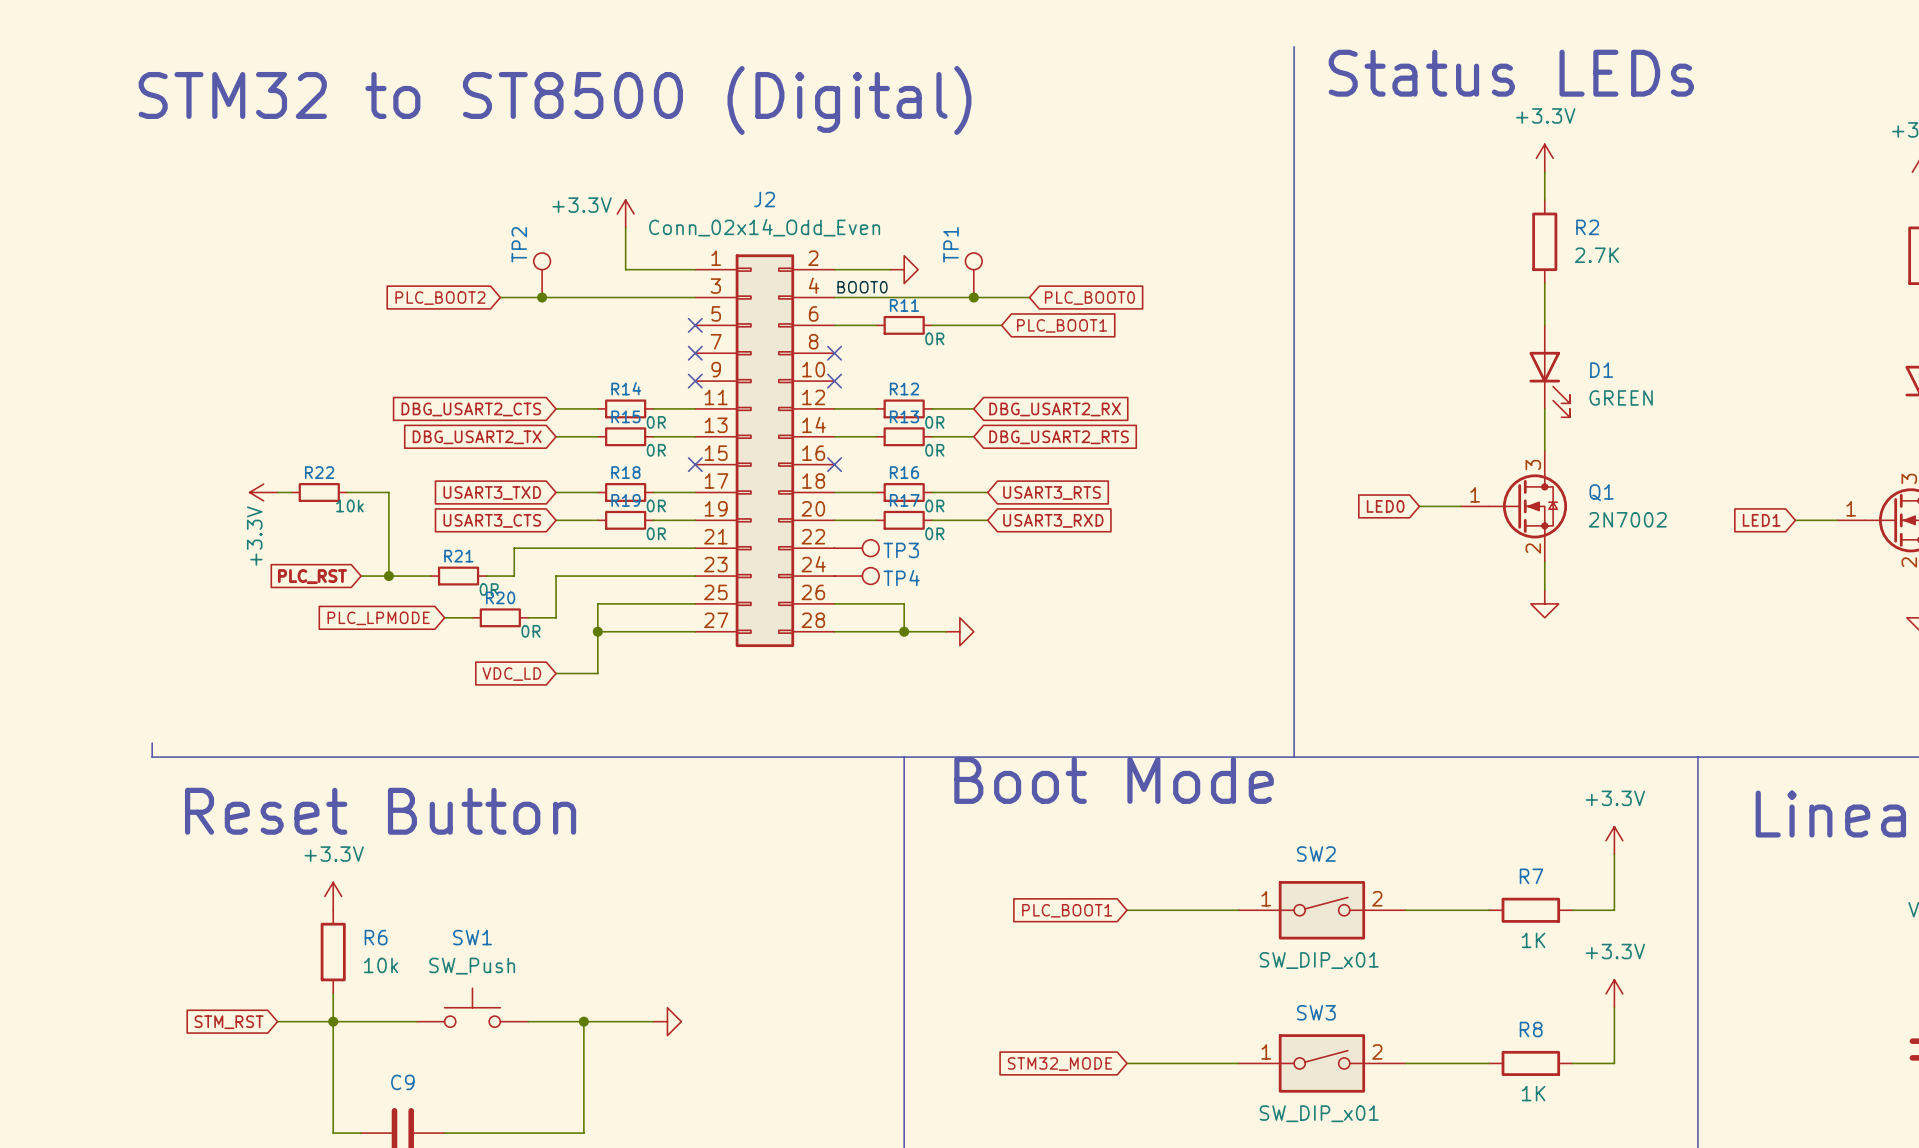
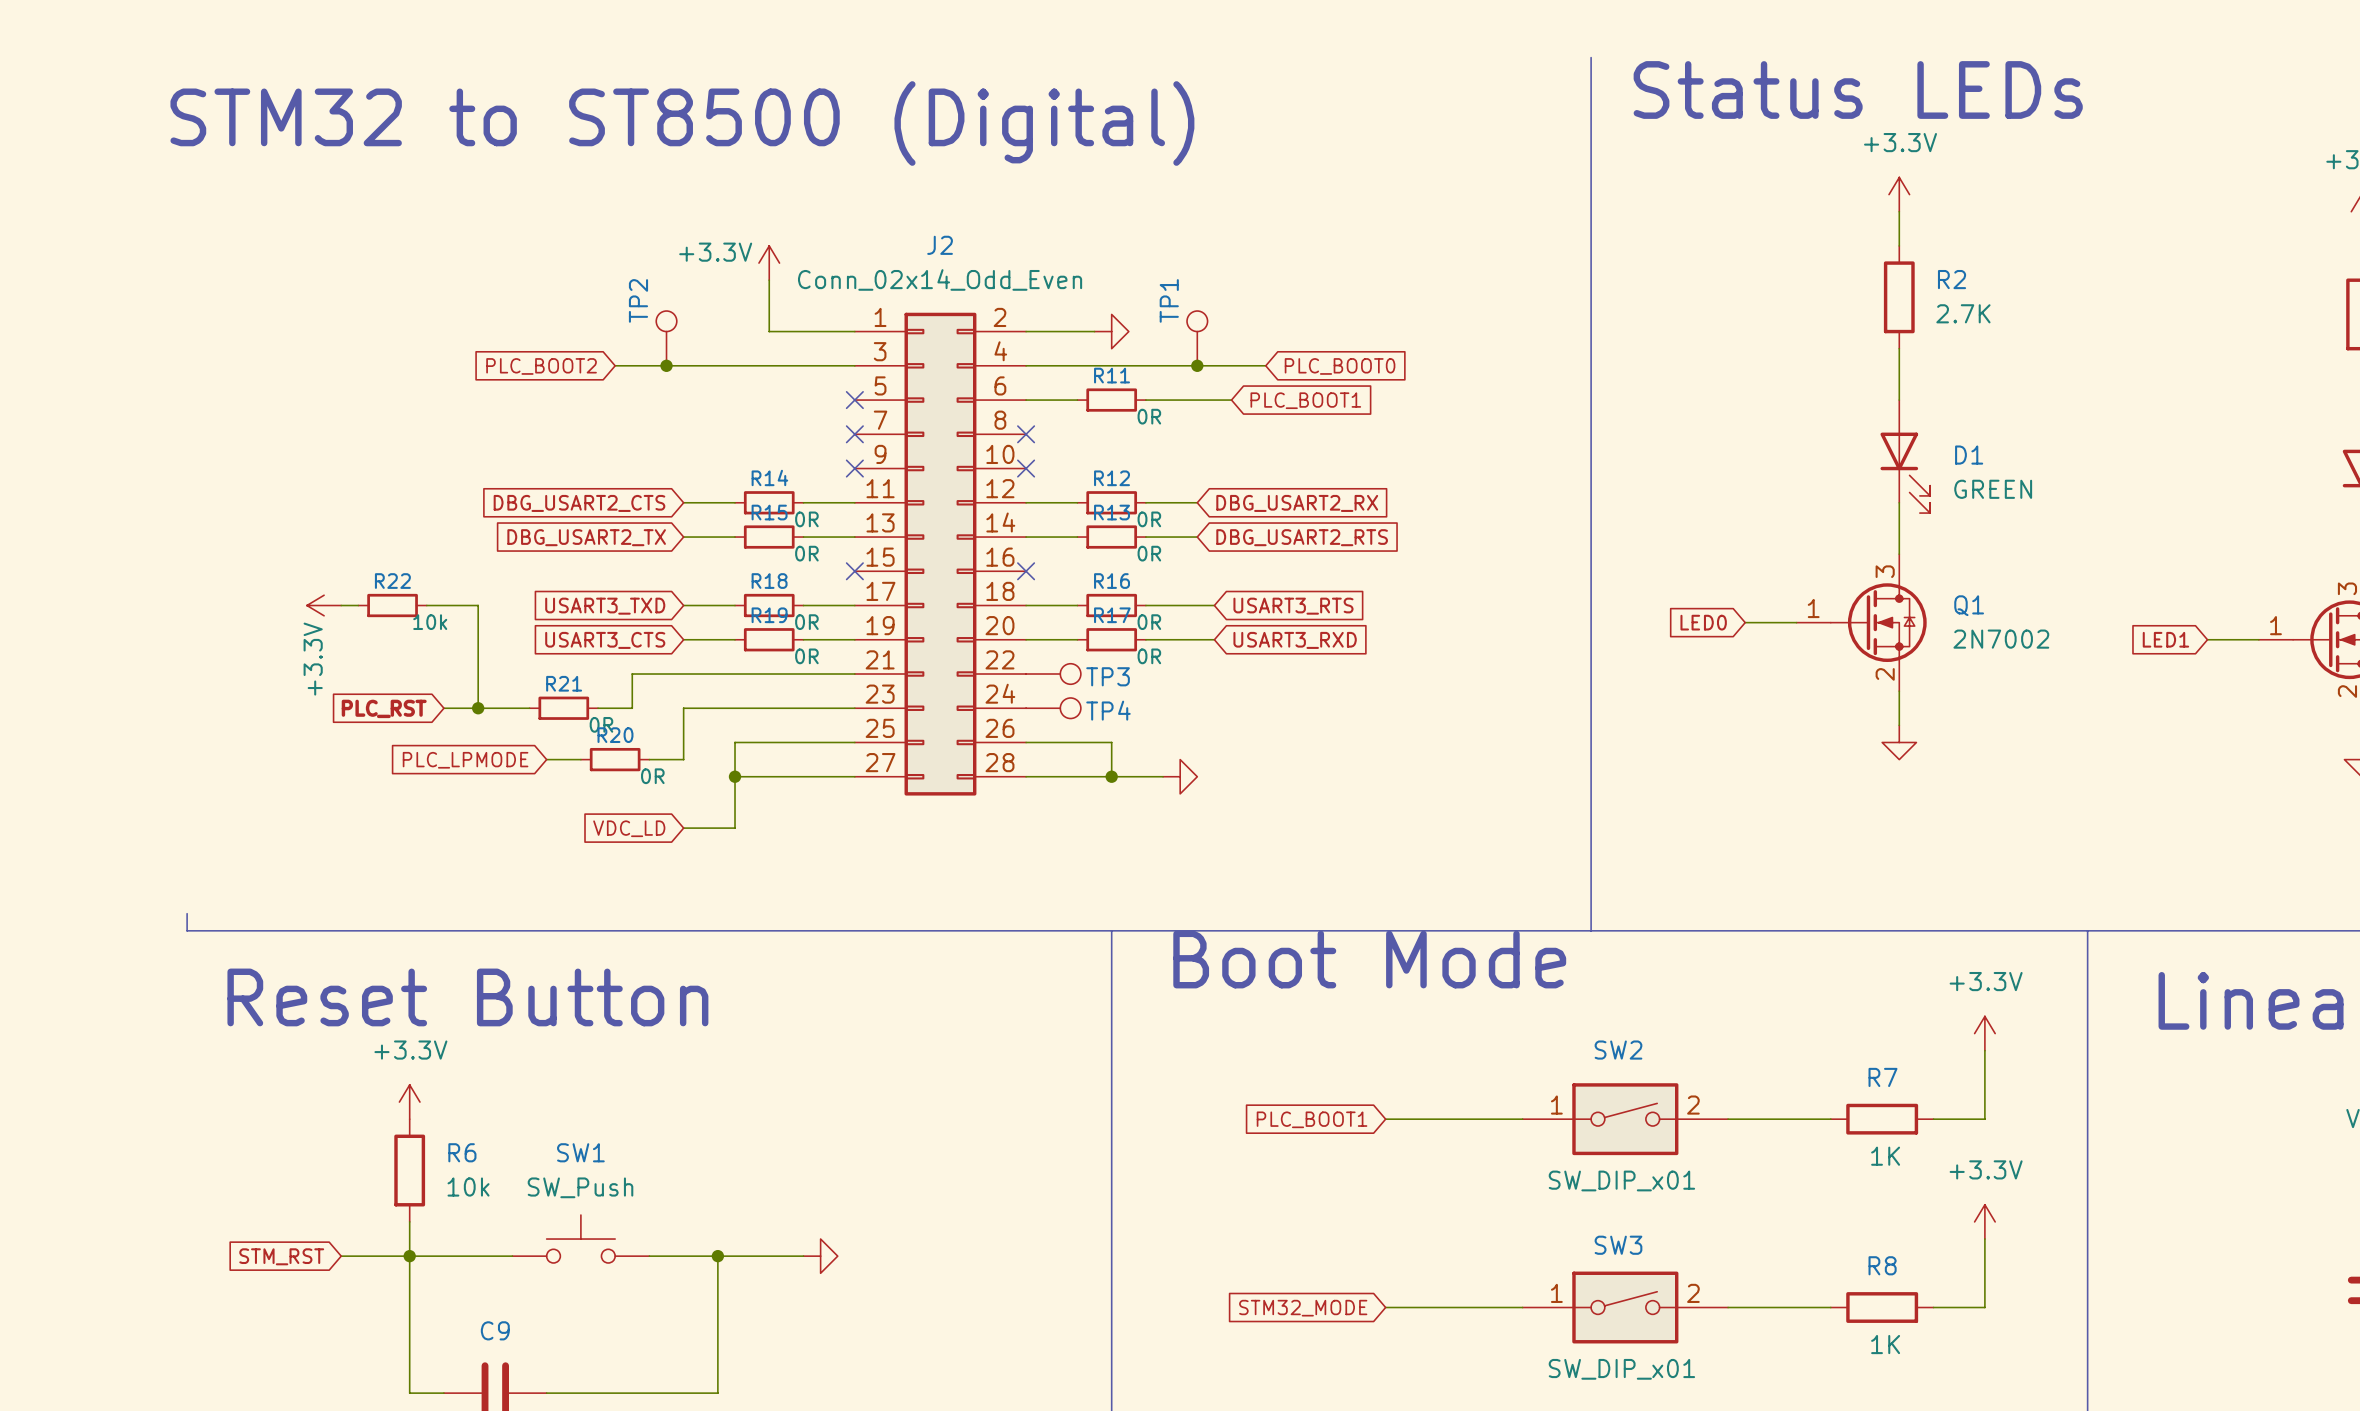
label: BOOT0 (862, 287) -> none

